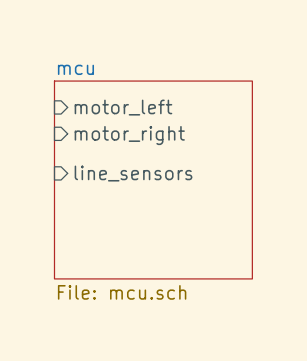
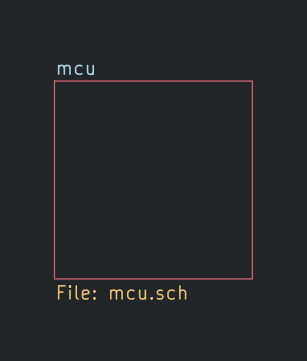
sheet pin: motor_left (123, 107) -> none
sheet pin: motor_right (129, 135) -> none
sheet pin: line_sensors (133, 173) -> none

